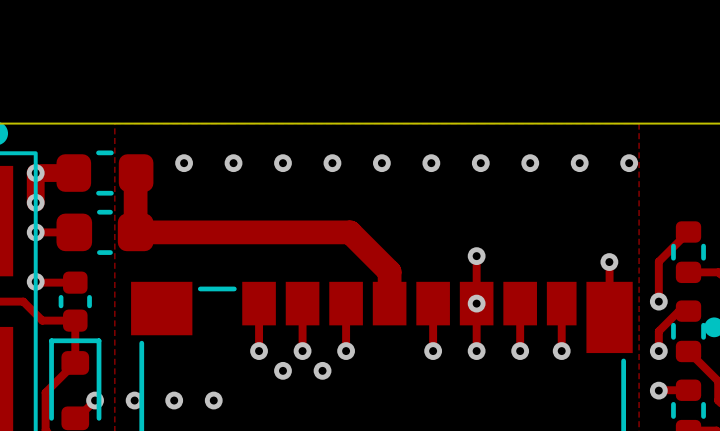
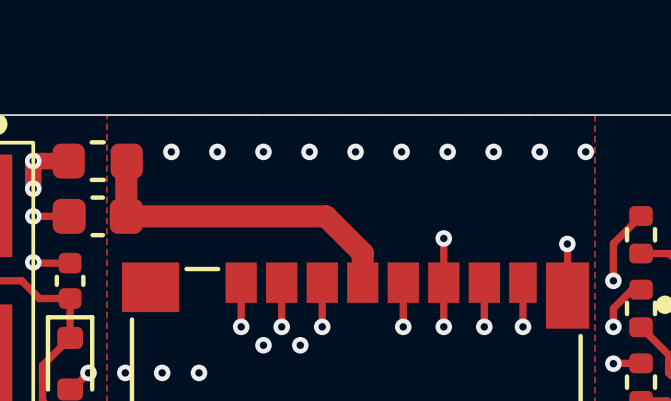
via: (476, 303) -> none

